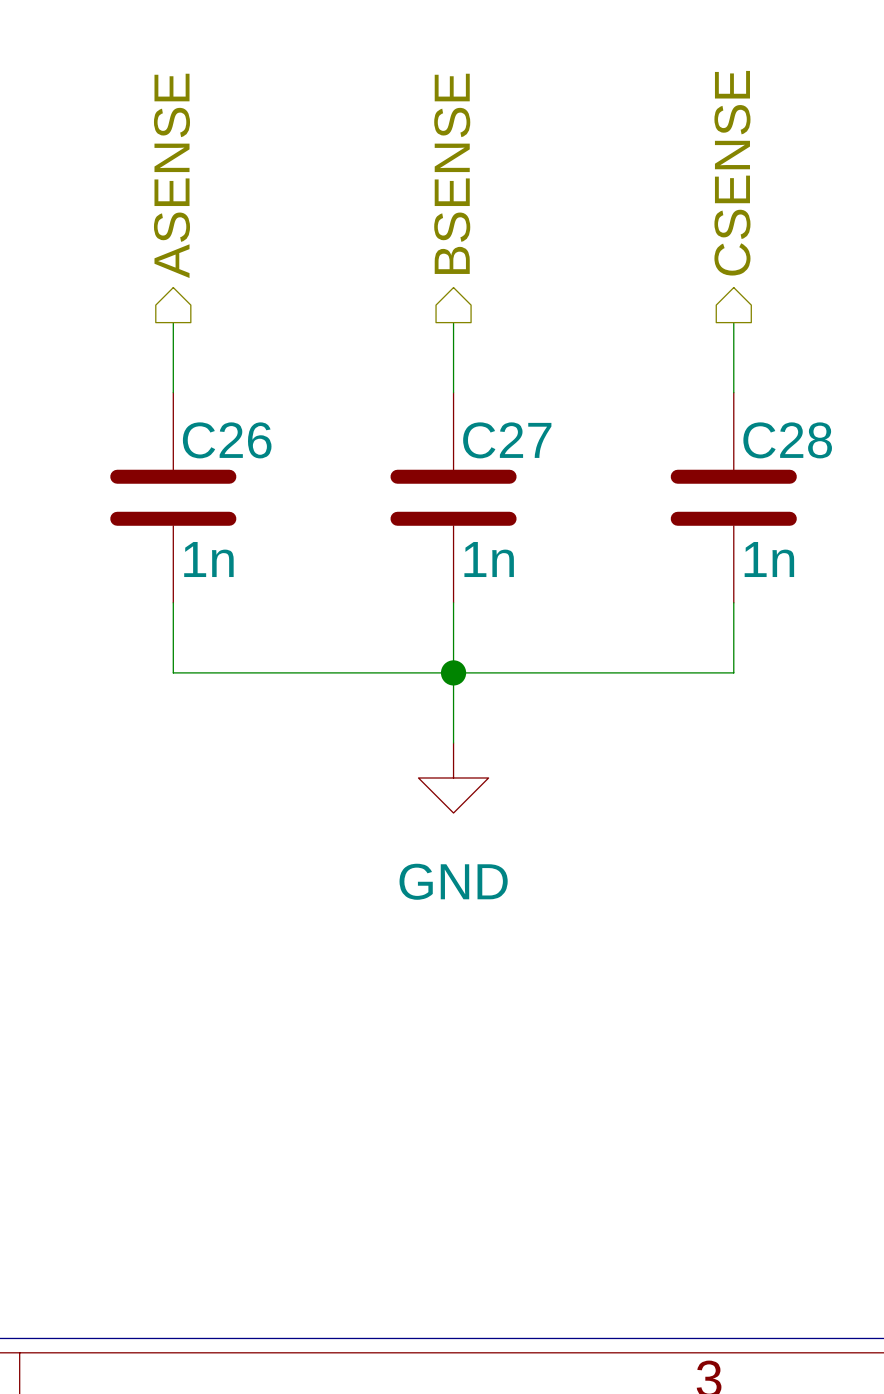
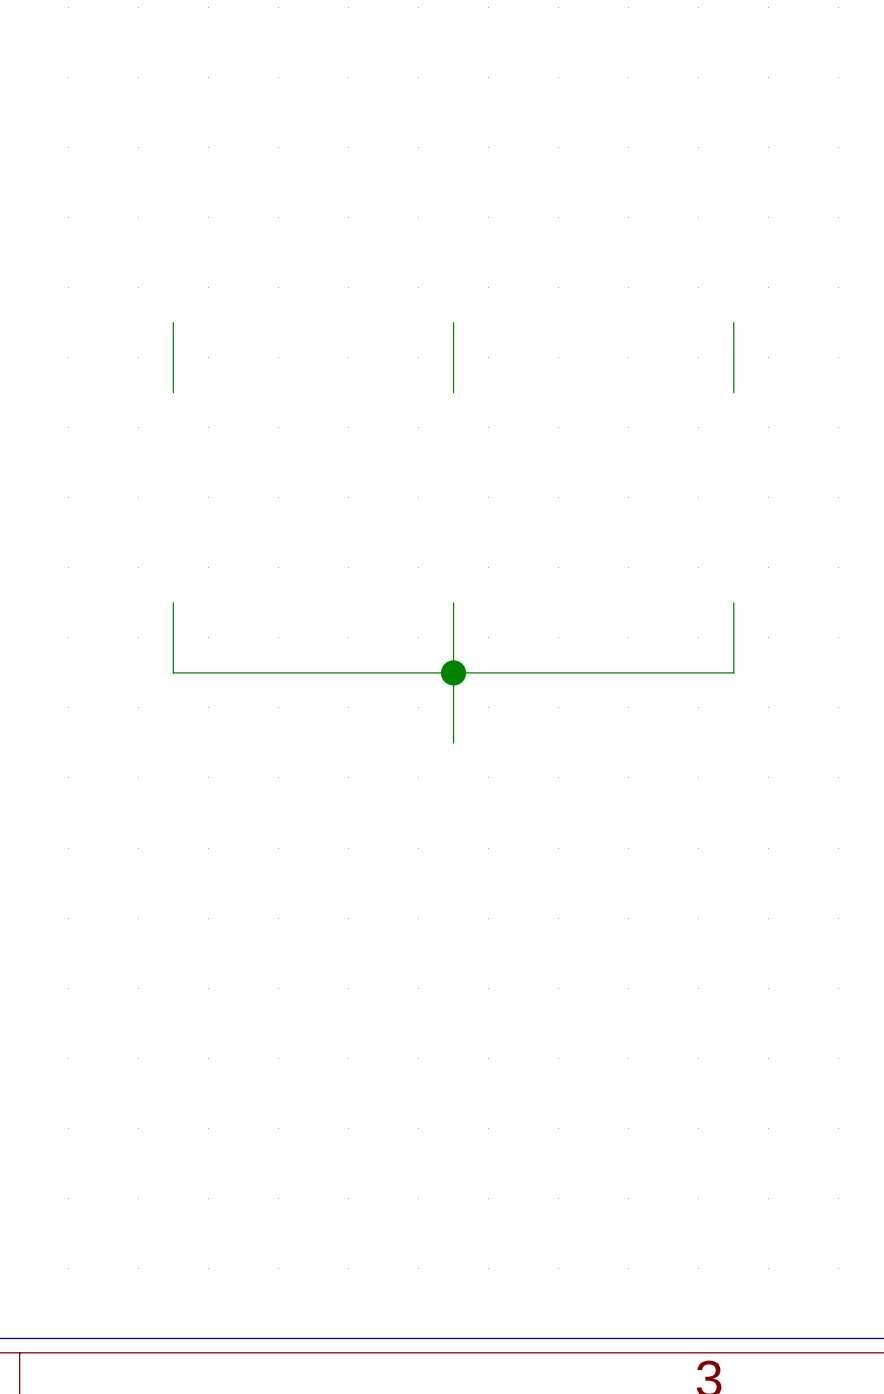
hierarchical label: BSENSE (452, 173) -> none
hierarchical label: CSENSE (732, 173) -> none
hierarchical label: ASENSE (171, 175) -> none
C26: 1n (173, 497) -> none
C27: 1n (453, 497) -> none
C28: 1n (733, 497) -> none
power symbol: GND (453, 777) -> none

